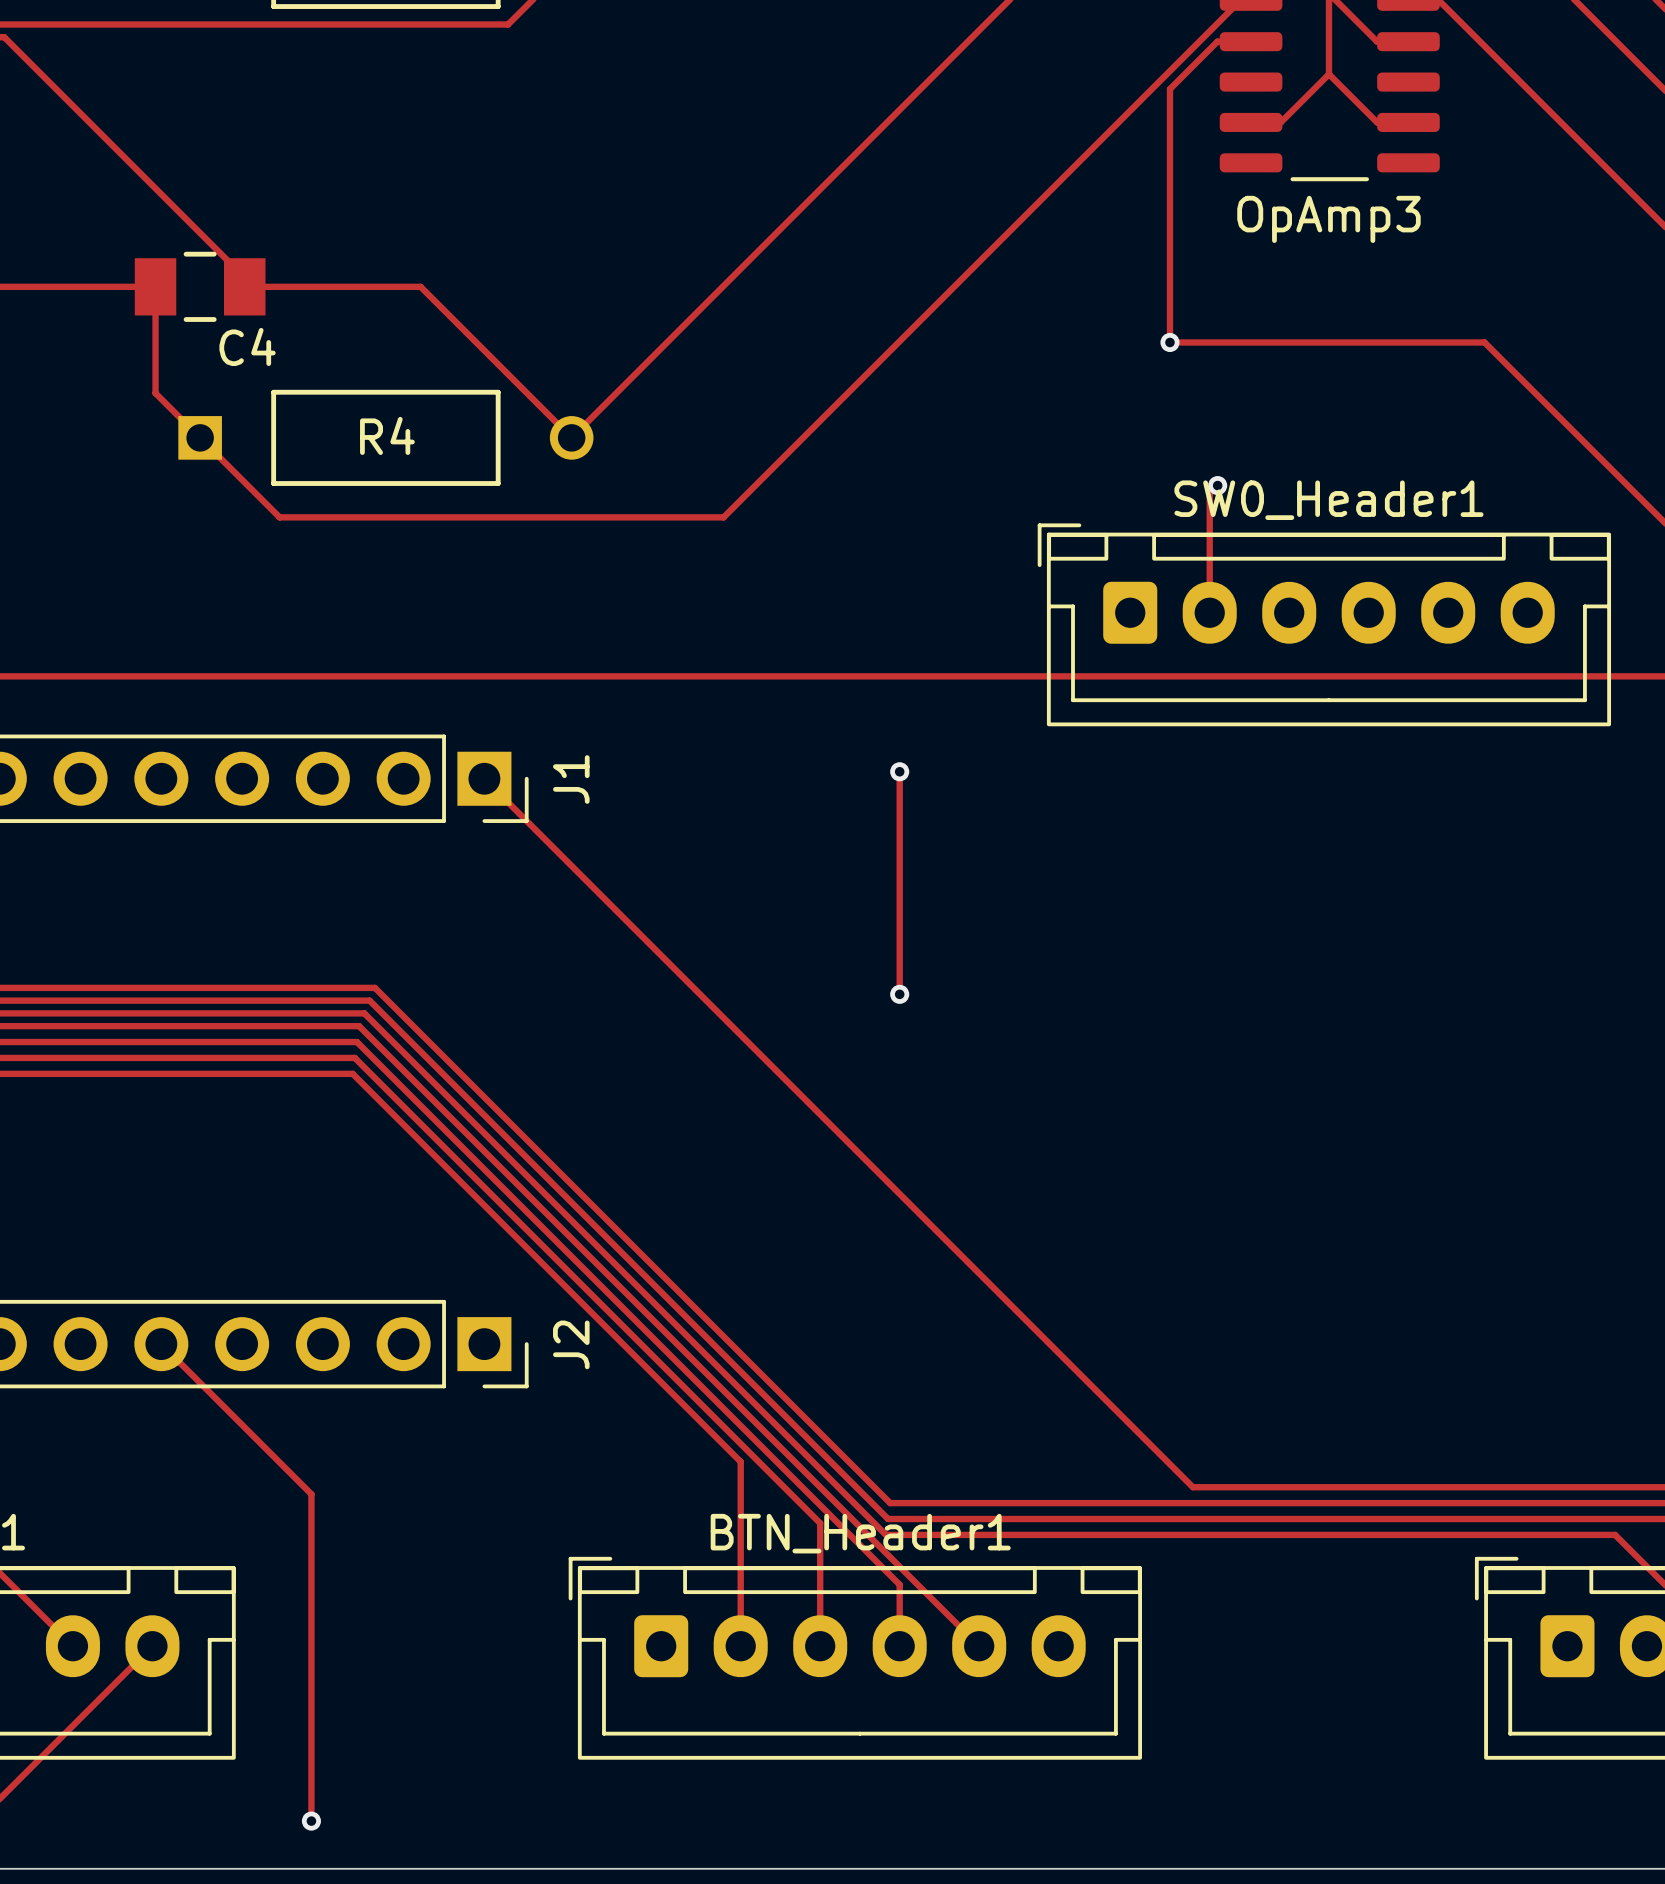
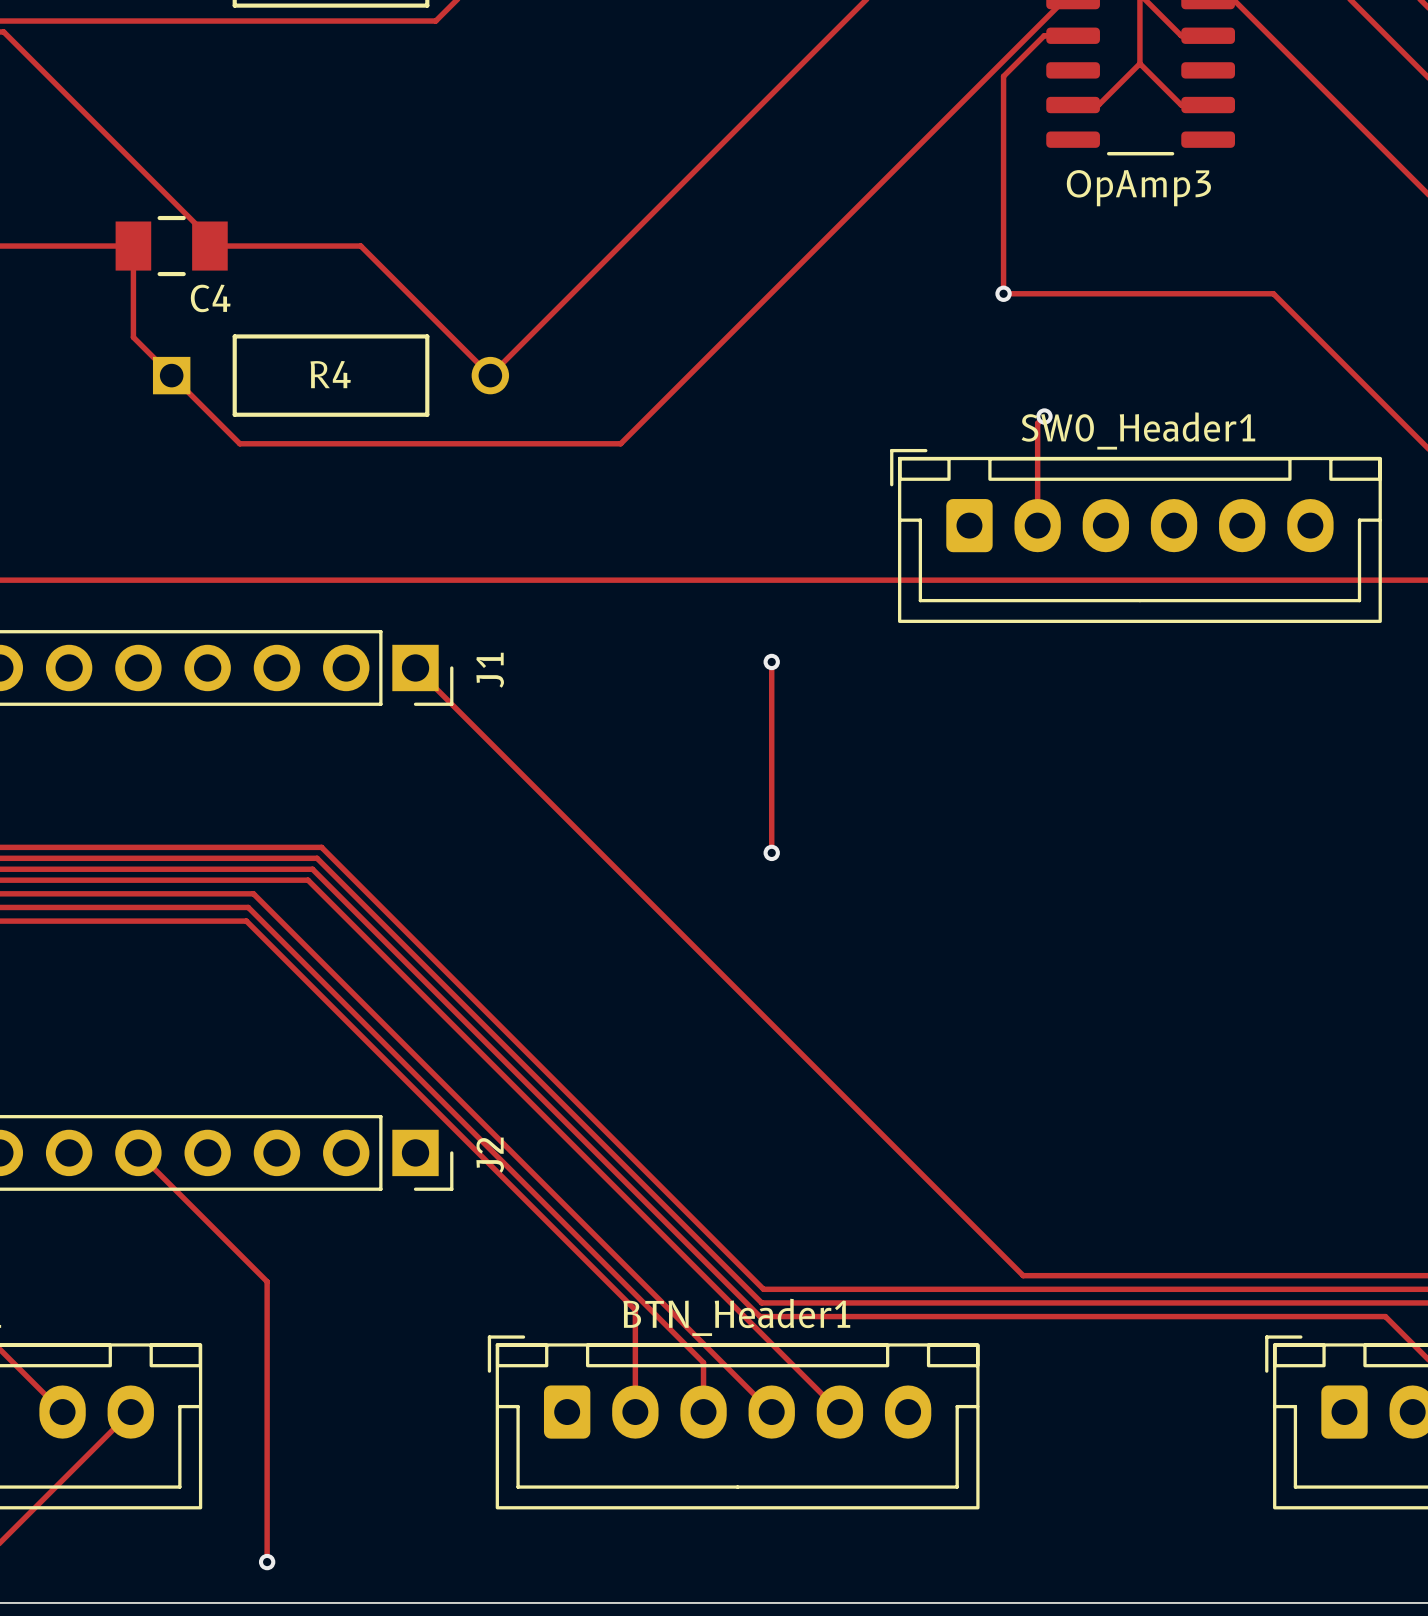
track: (295, 1042) (357, 1042) (899, 1584) (899, 1646) -> (253, 893) (771, 1412)
track: (289, 1057) (354, 1057) (820, 1523) (820, 1588) -> (248, 907) (703, 1362)
track: (287, 1073) (352, 1073) (740, 1461) (740, 1527) -> (246, 921) (635, 1309)

